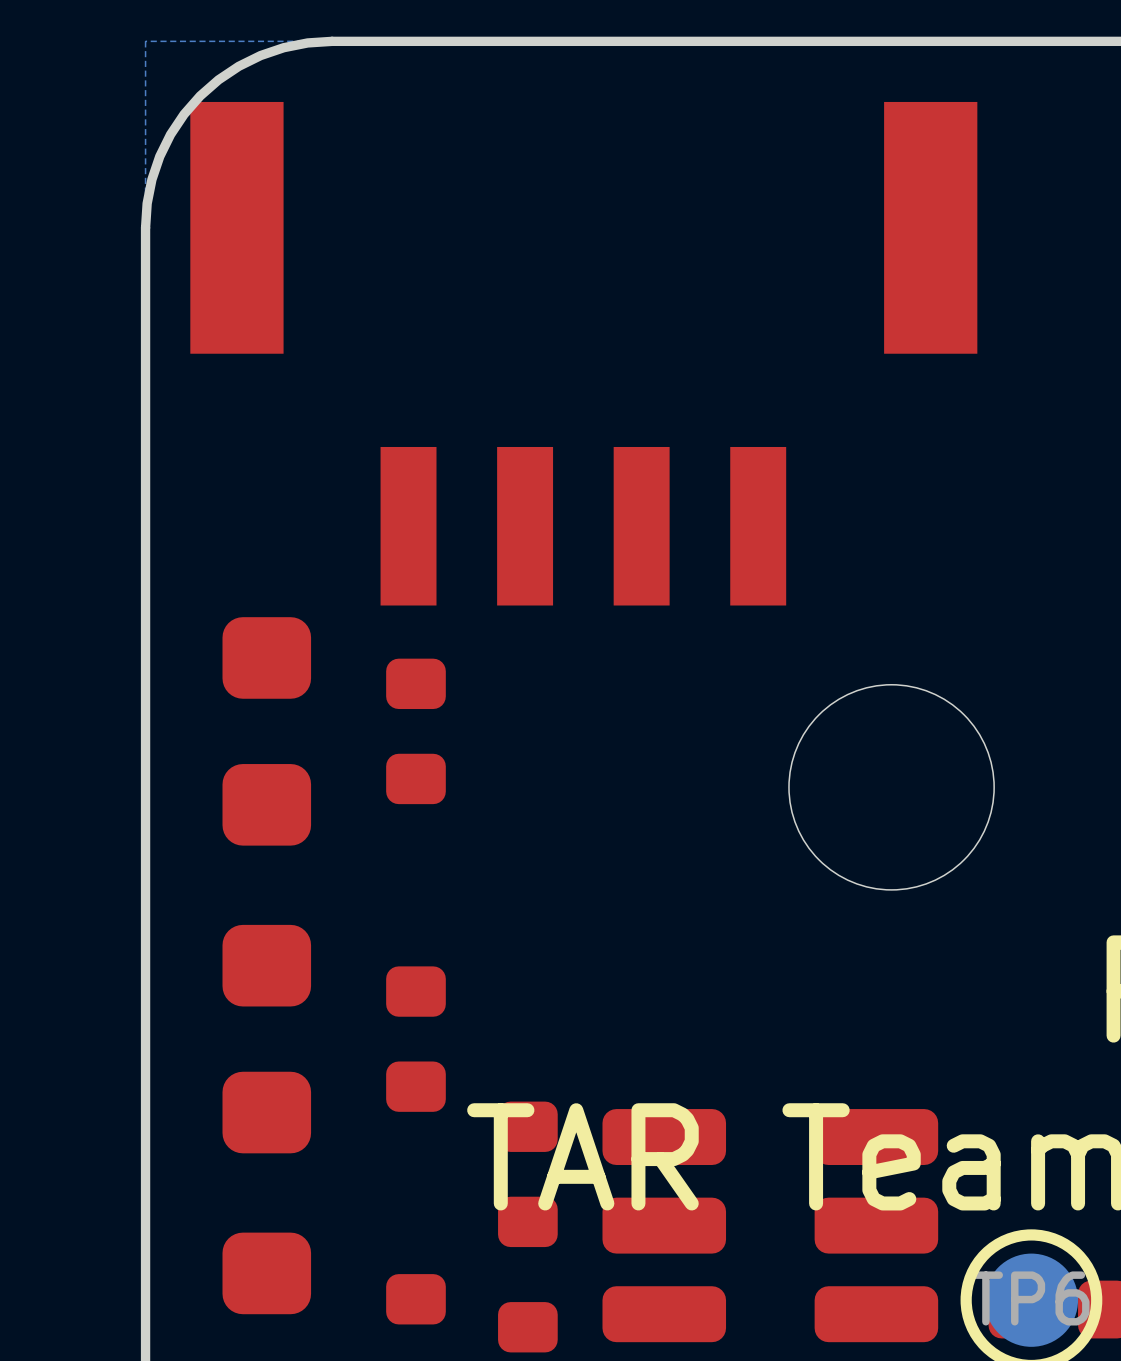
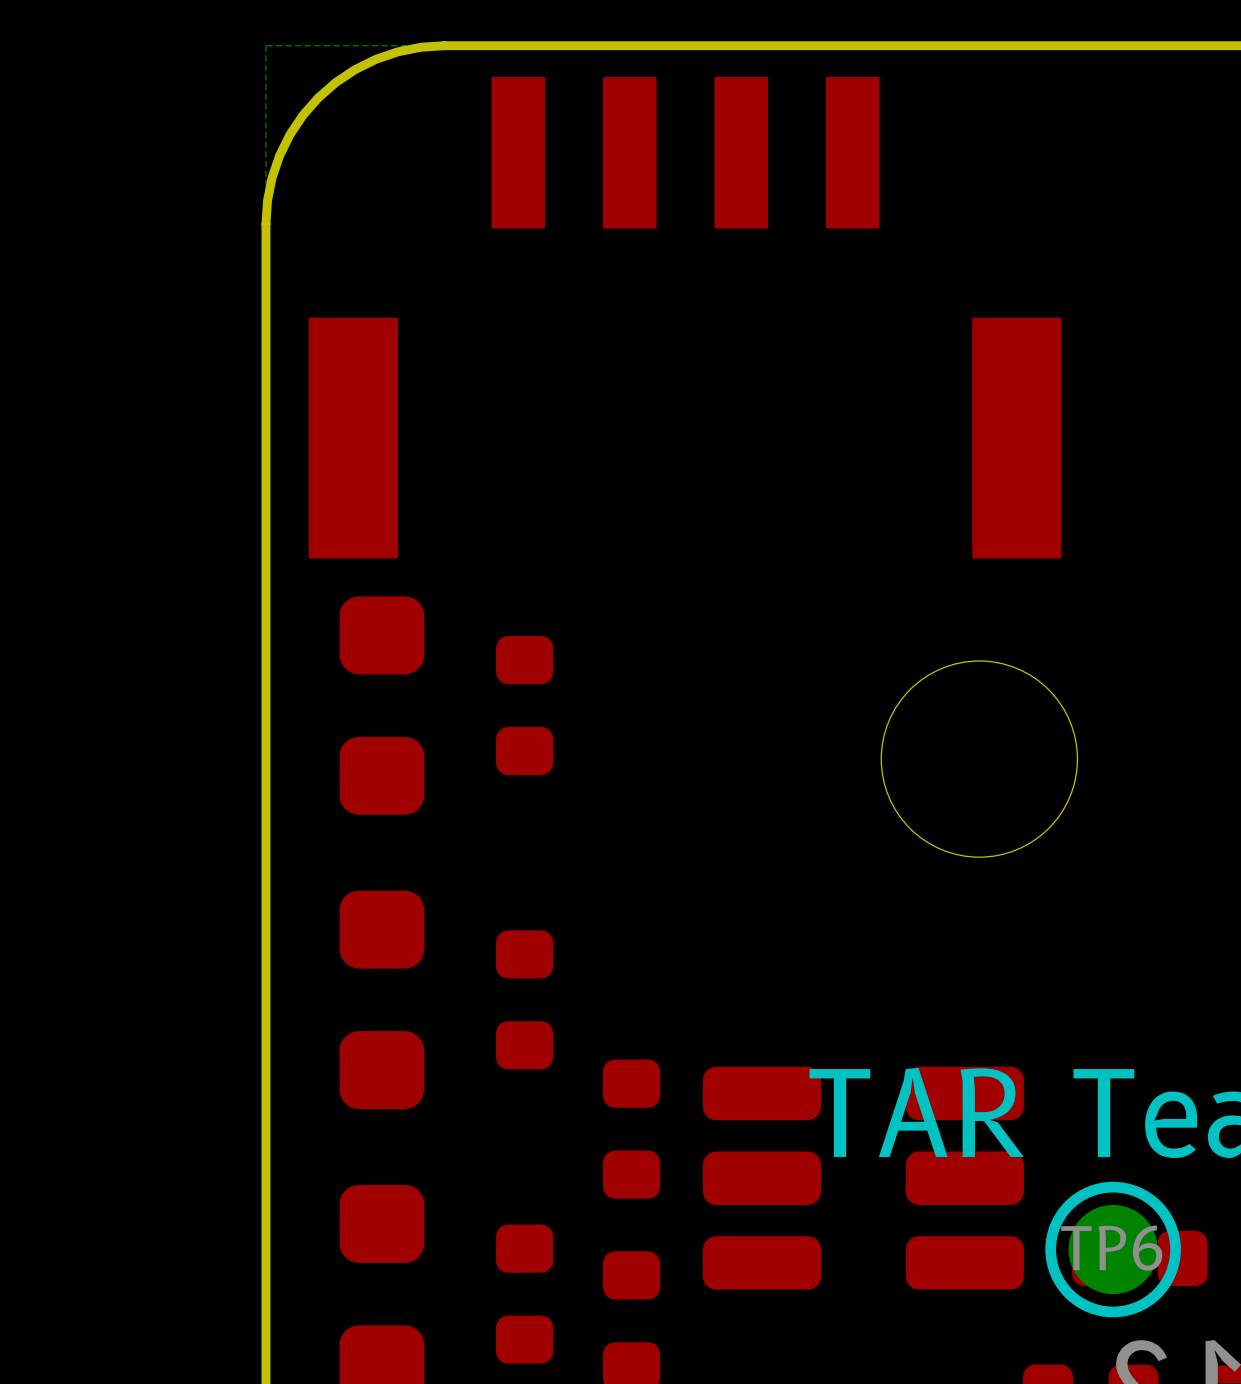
part rotation: 0° (583, 353) -> 180° (685, 317)

